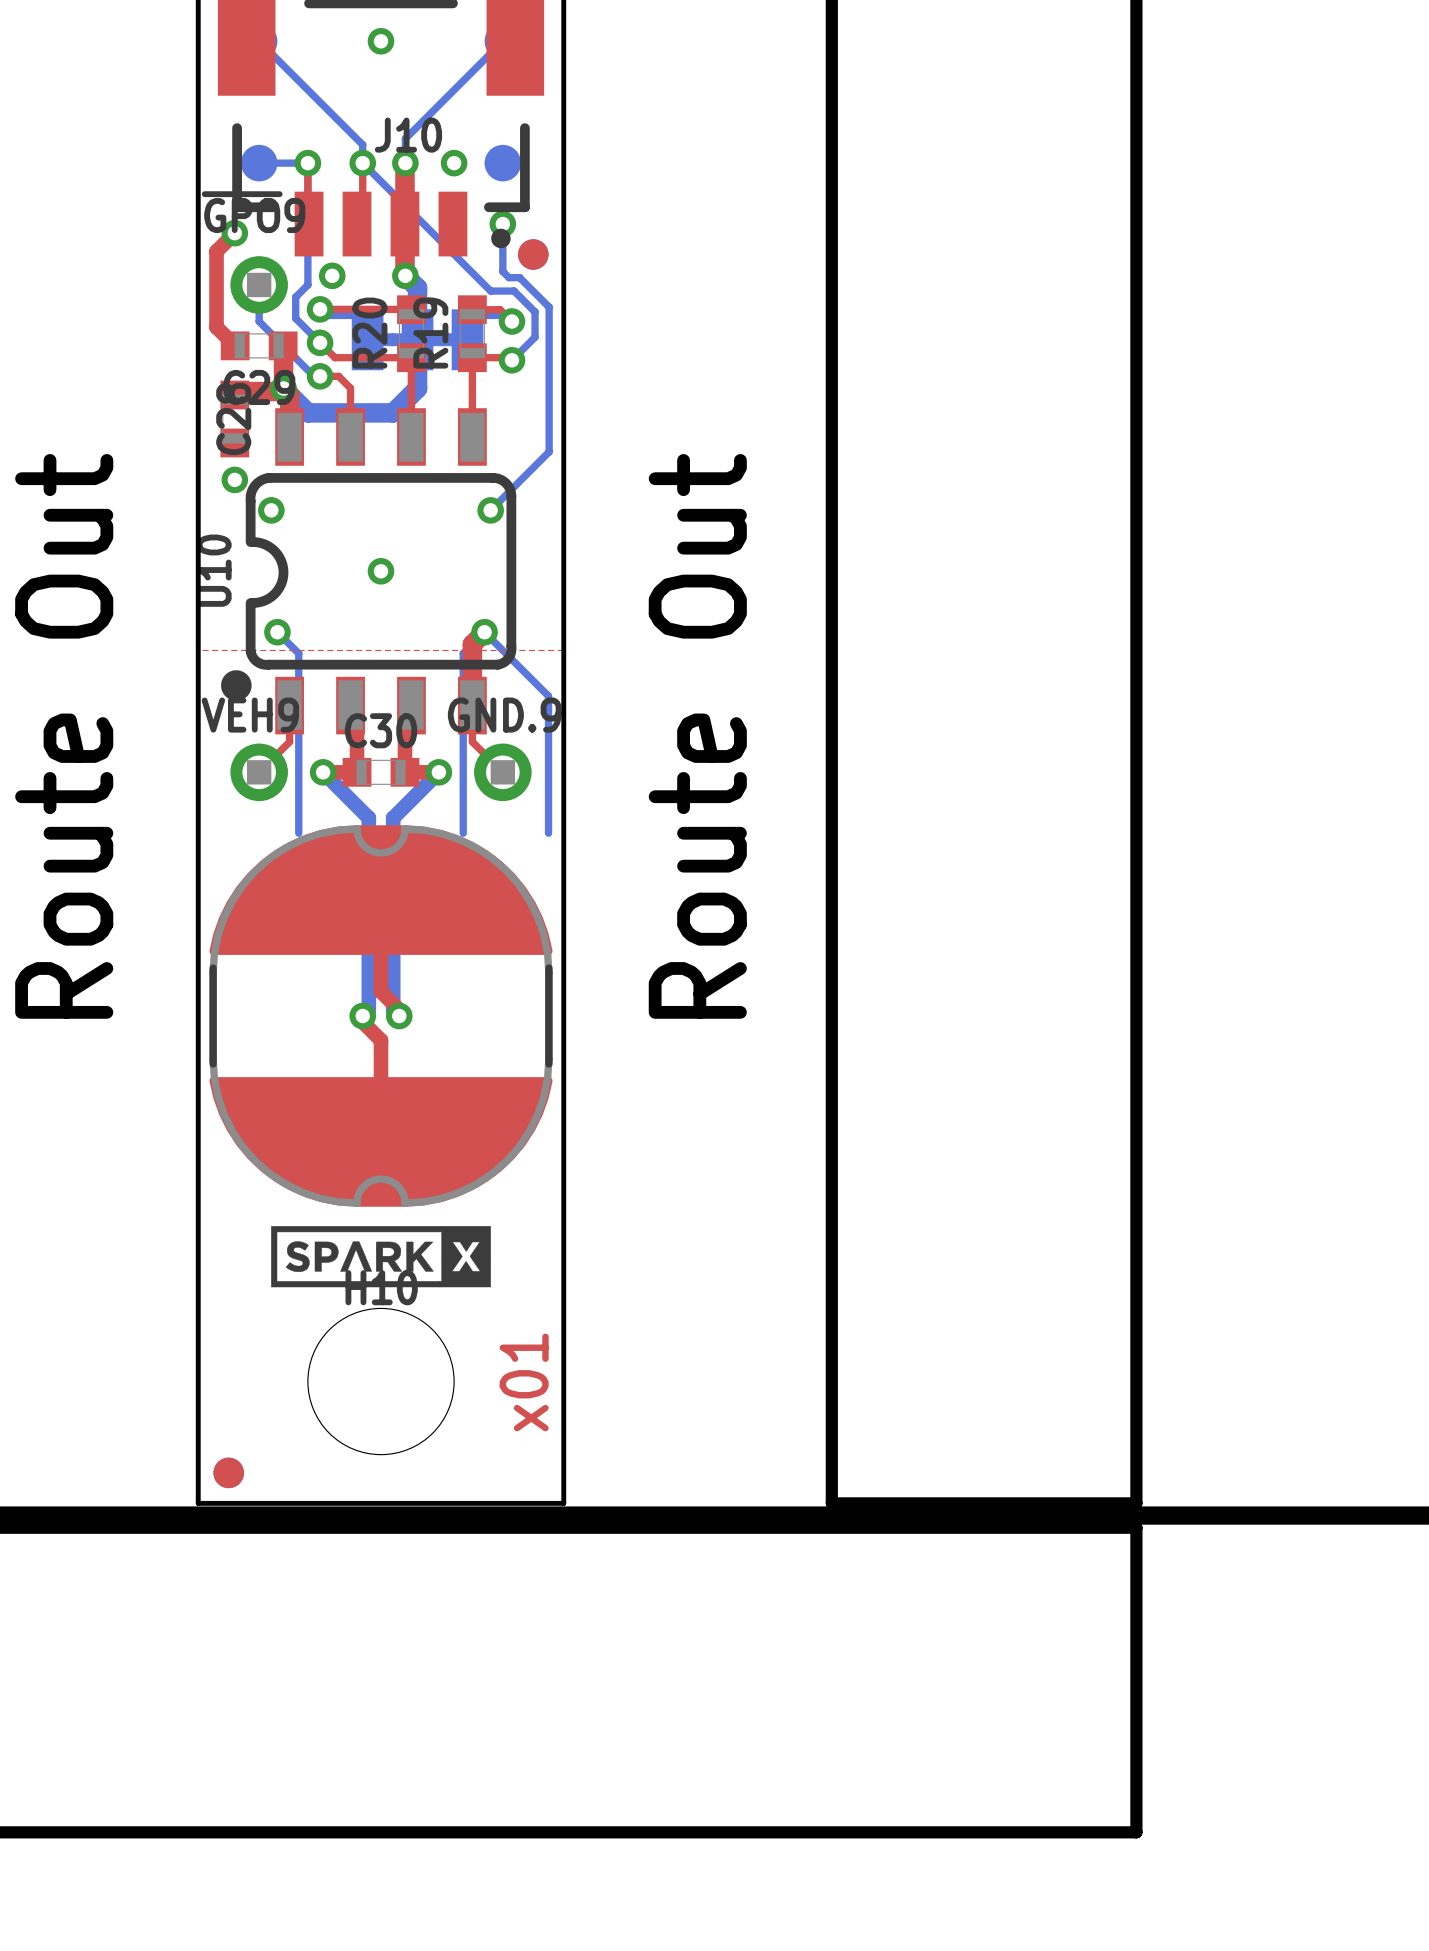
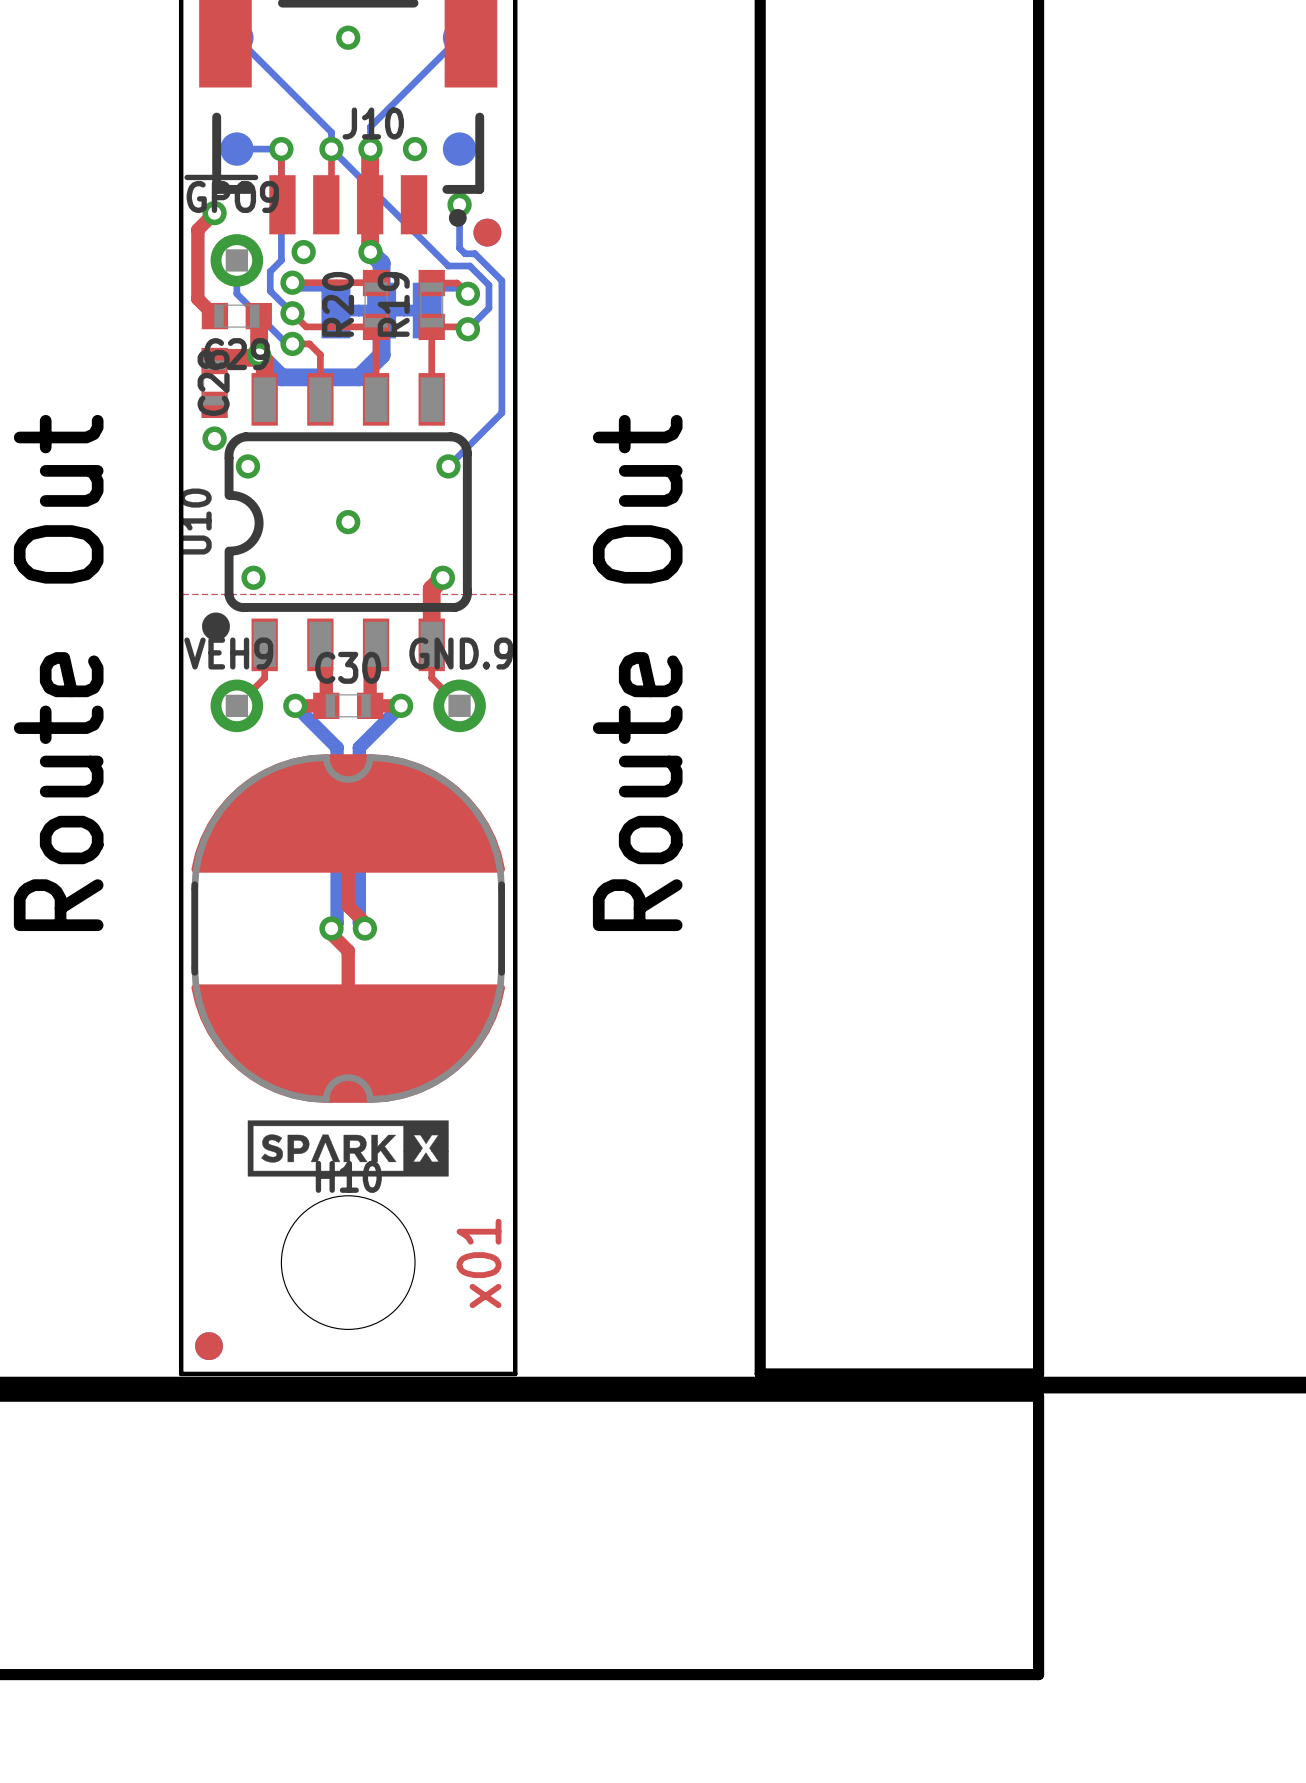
bottom track: (277, 632) (298, 653) (298, 833) -> none
bottom track: (463, 833) (463, 653) (484, 632) (548, 696) (548, 833) -> none

